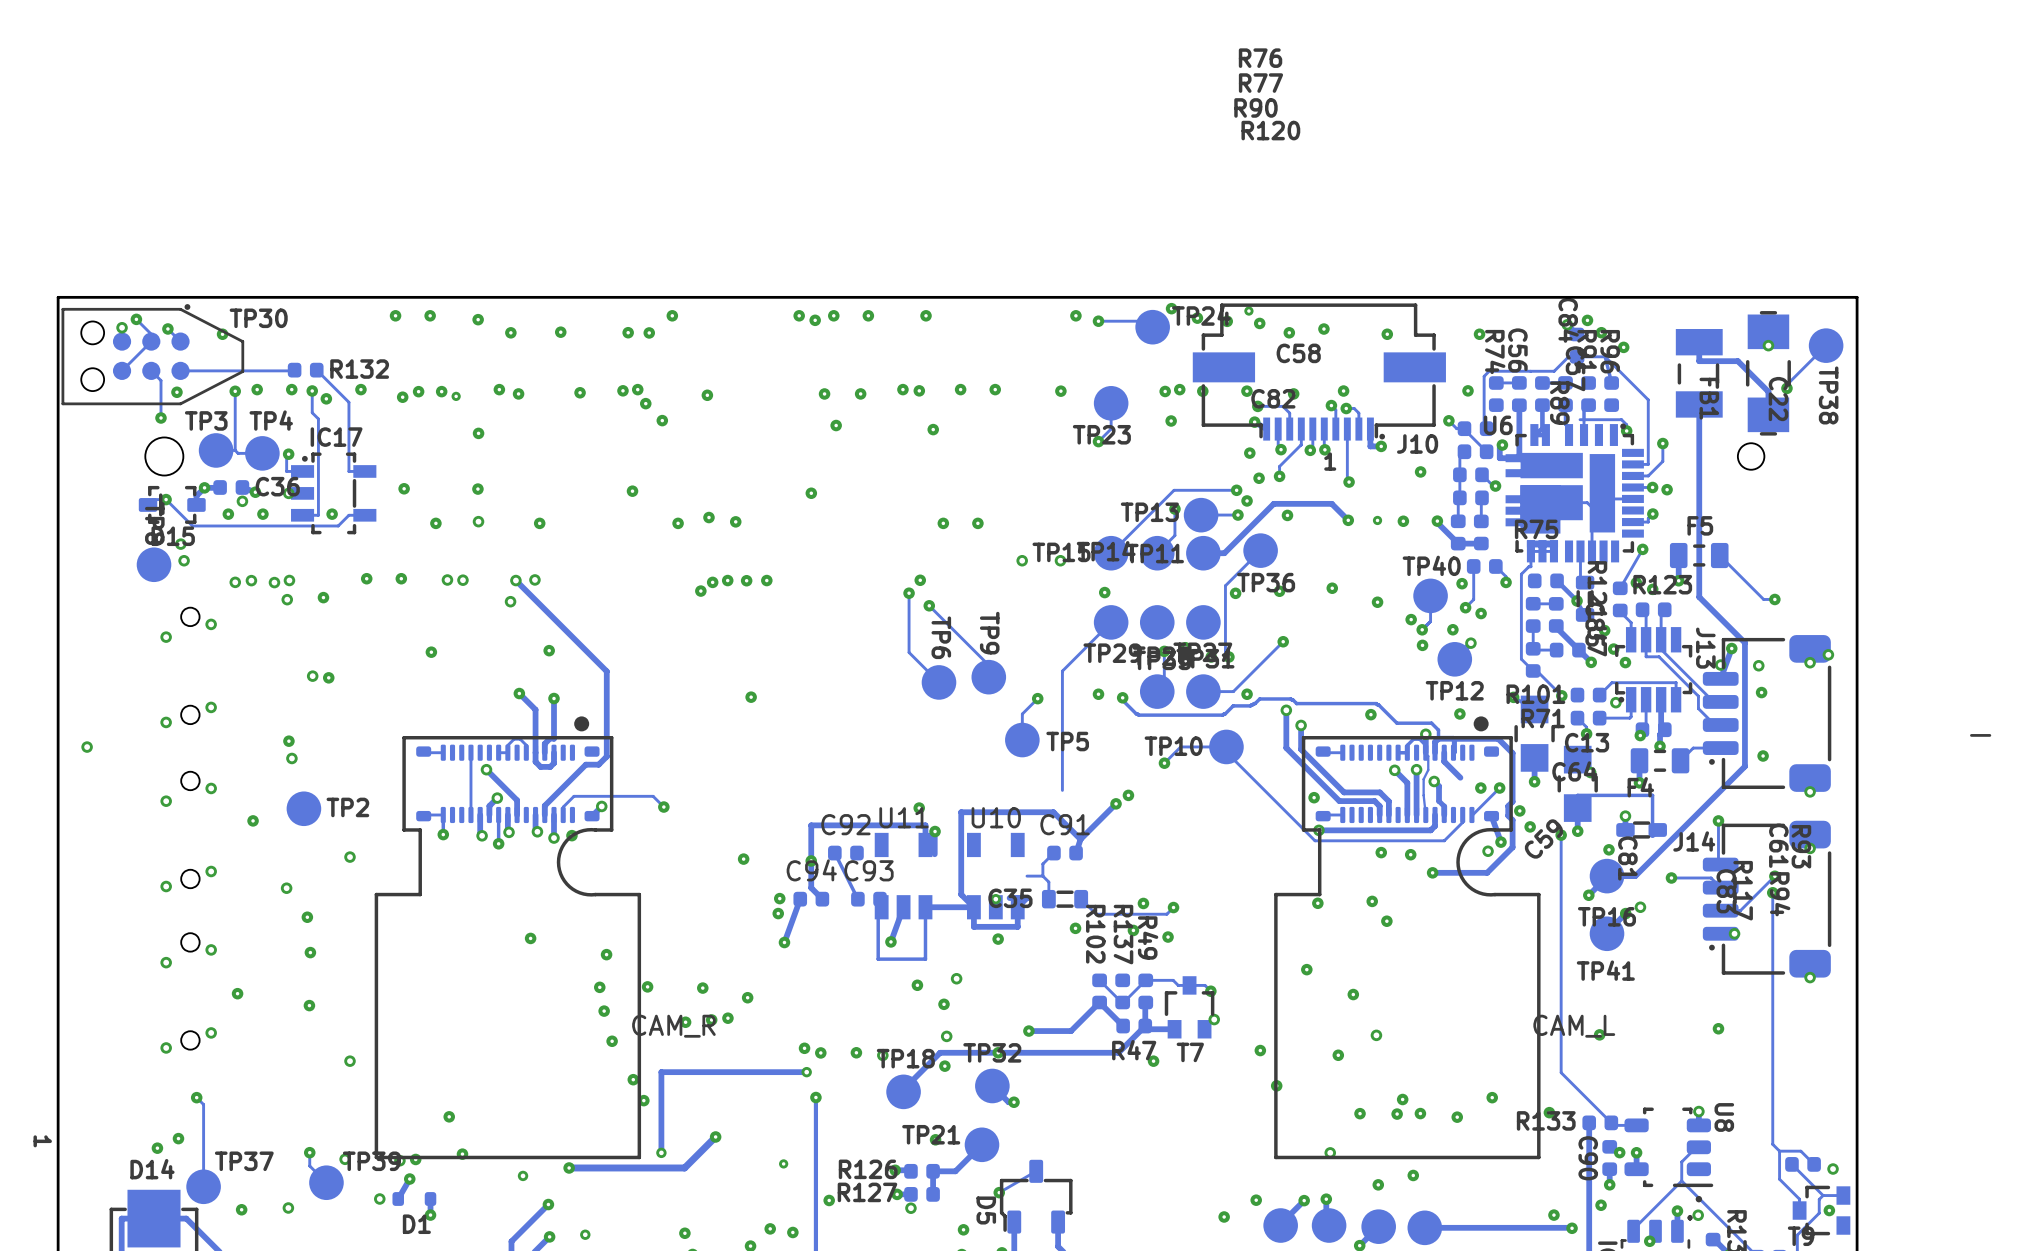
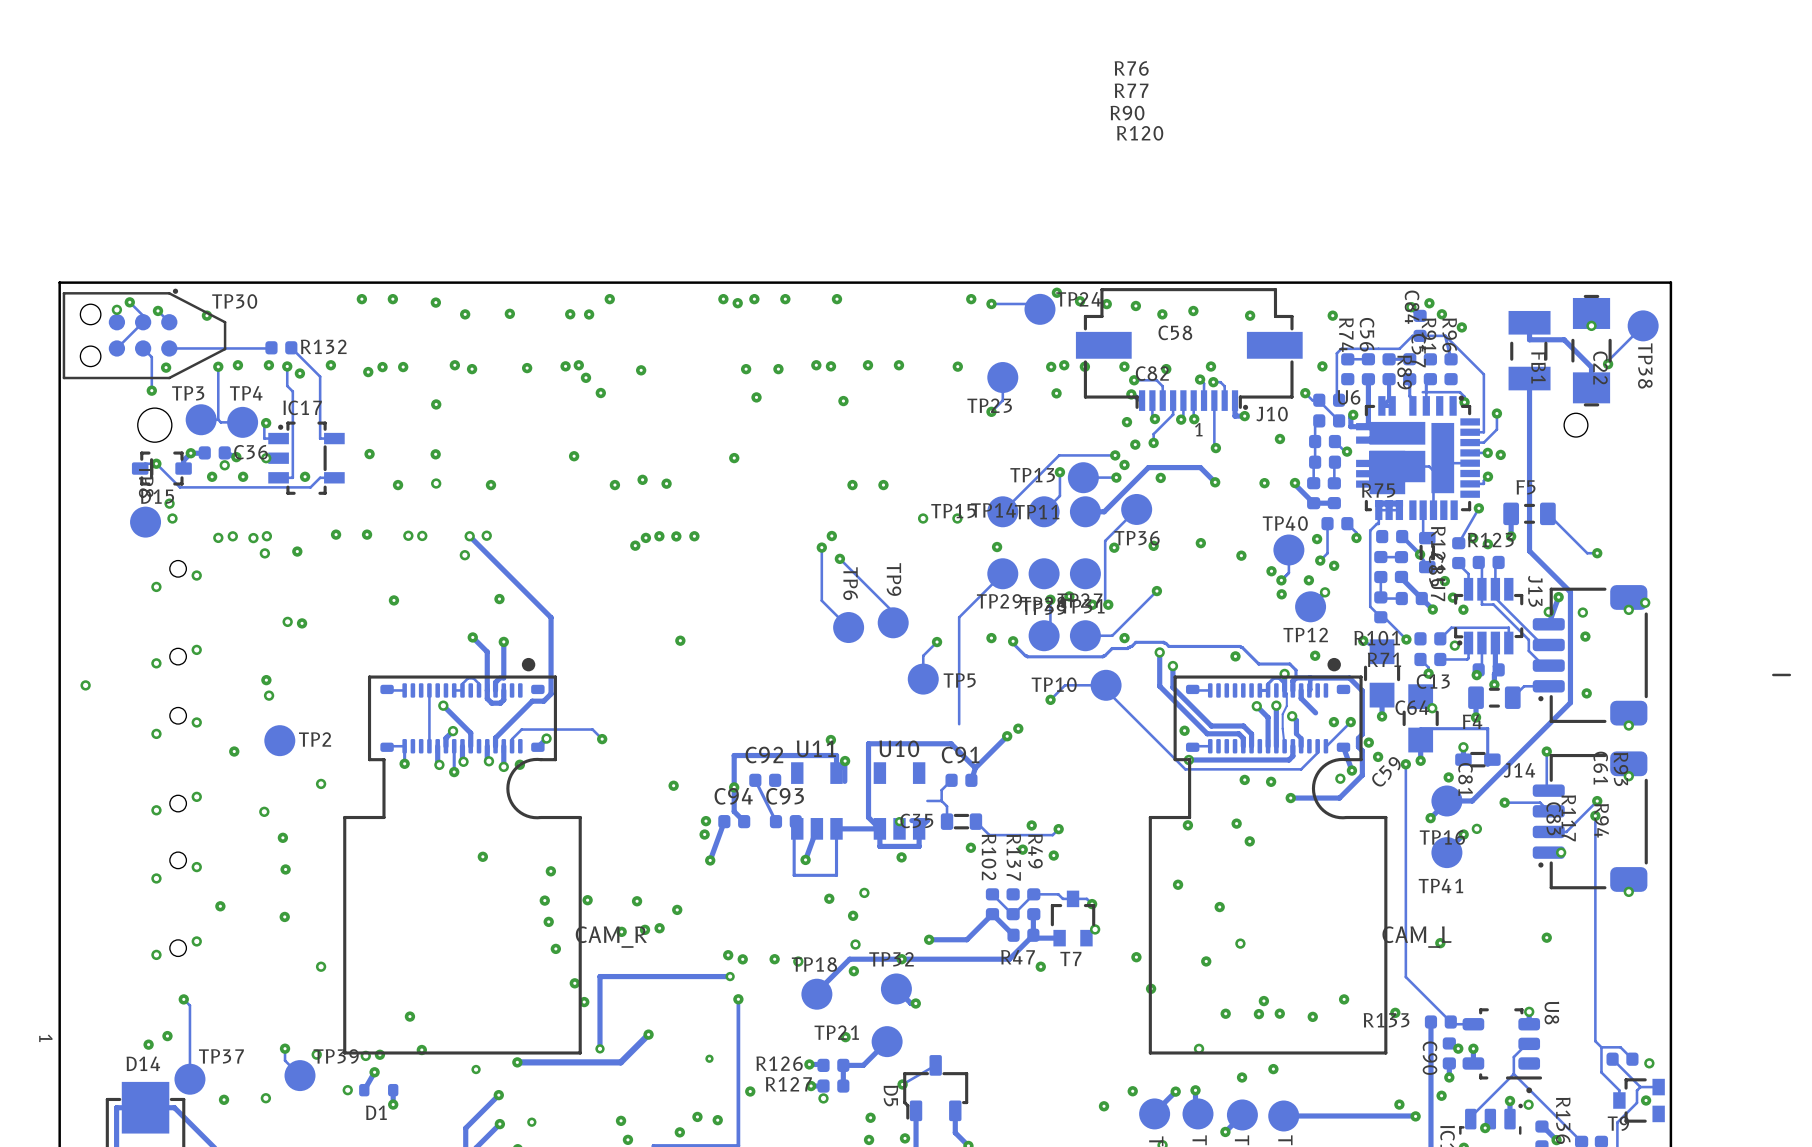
via: (1248, 311) -> none
via: (456, 396) -> none
via: (1377, 520) -> none

